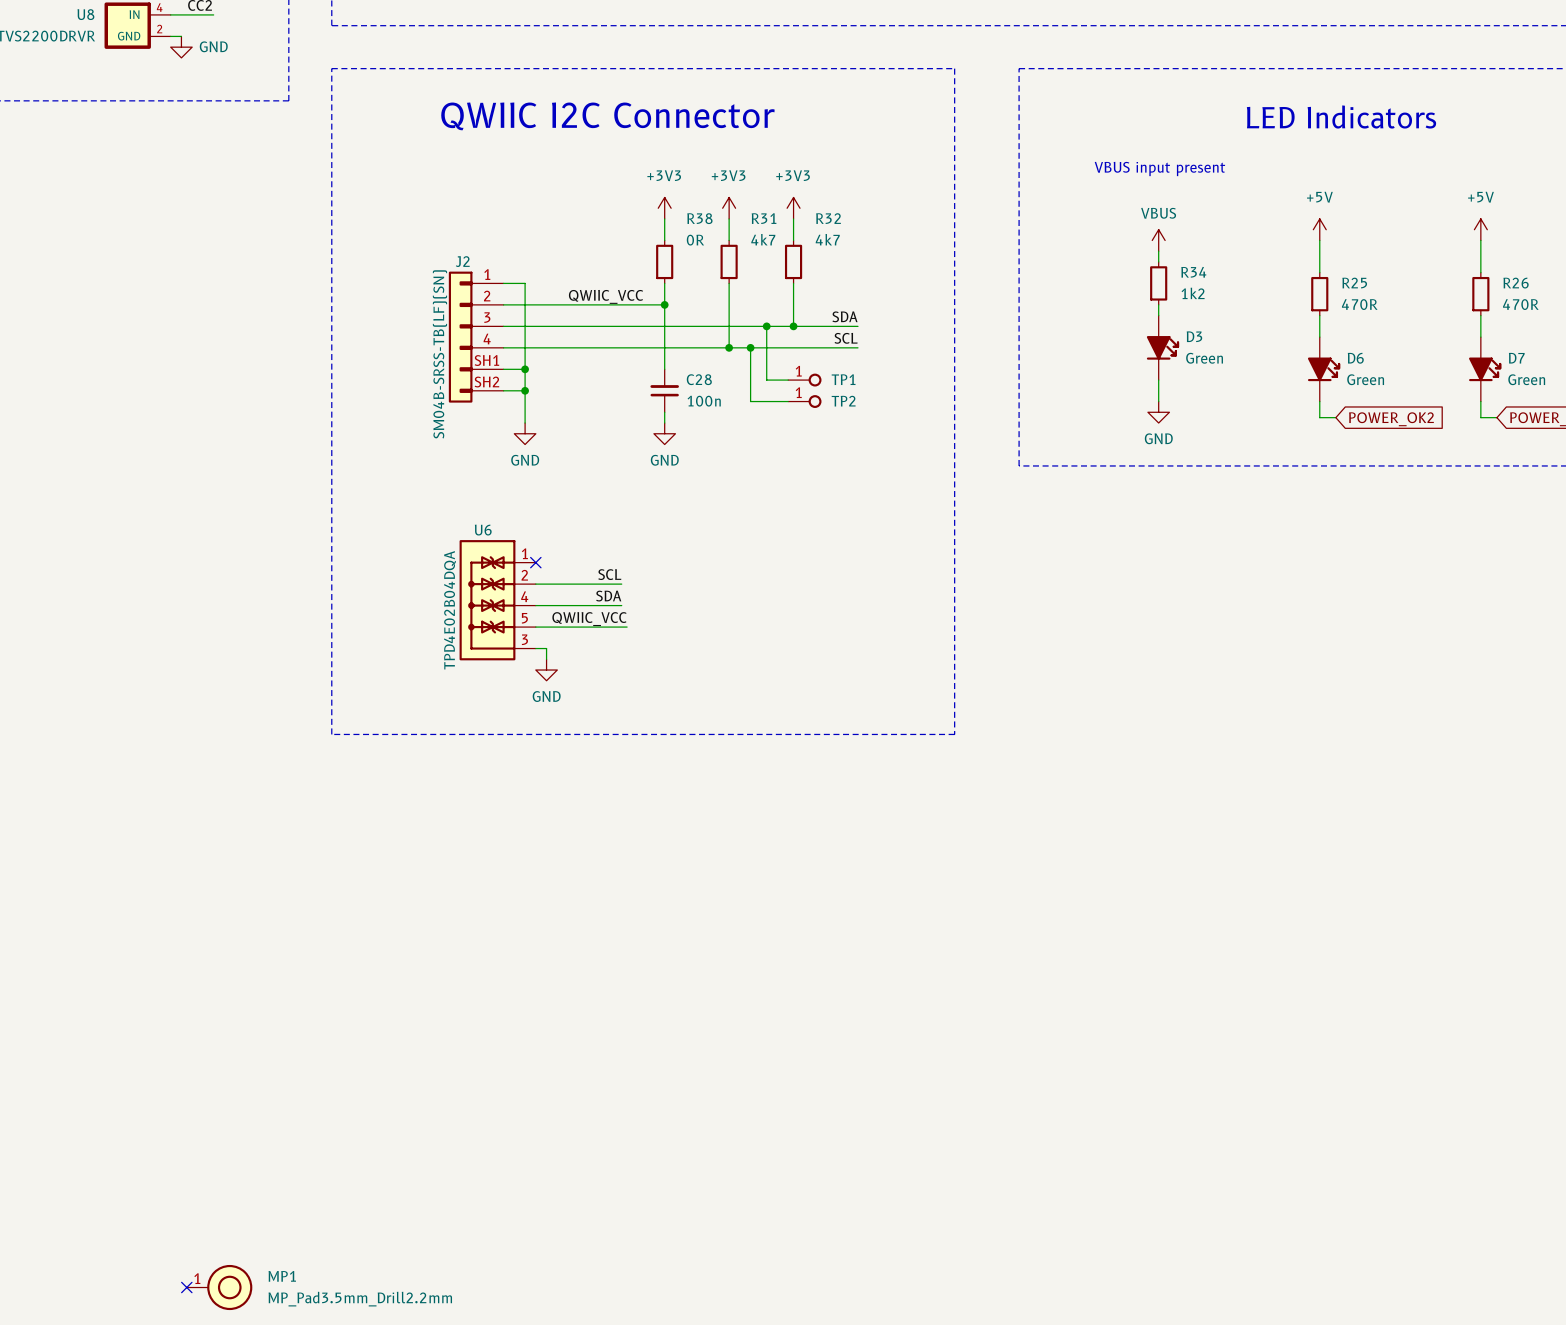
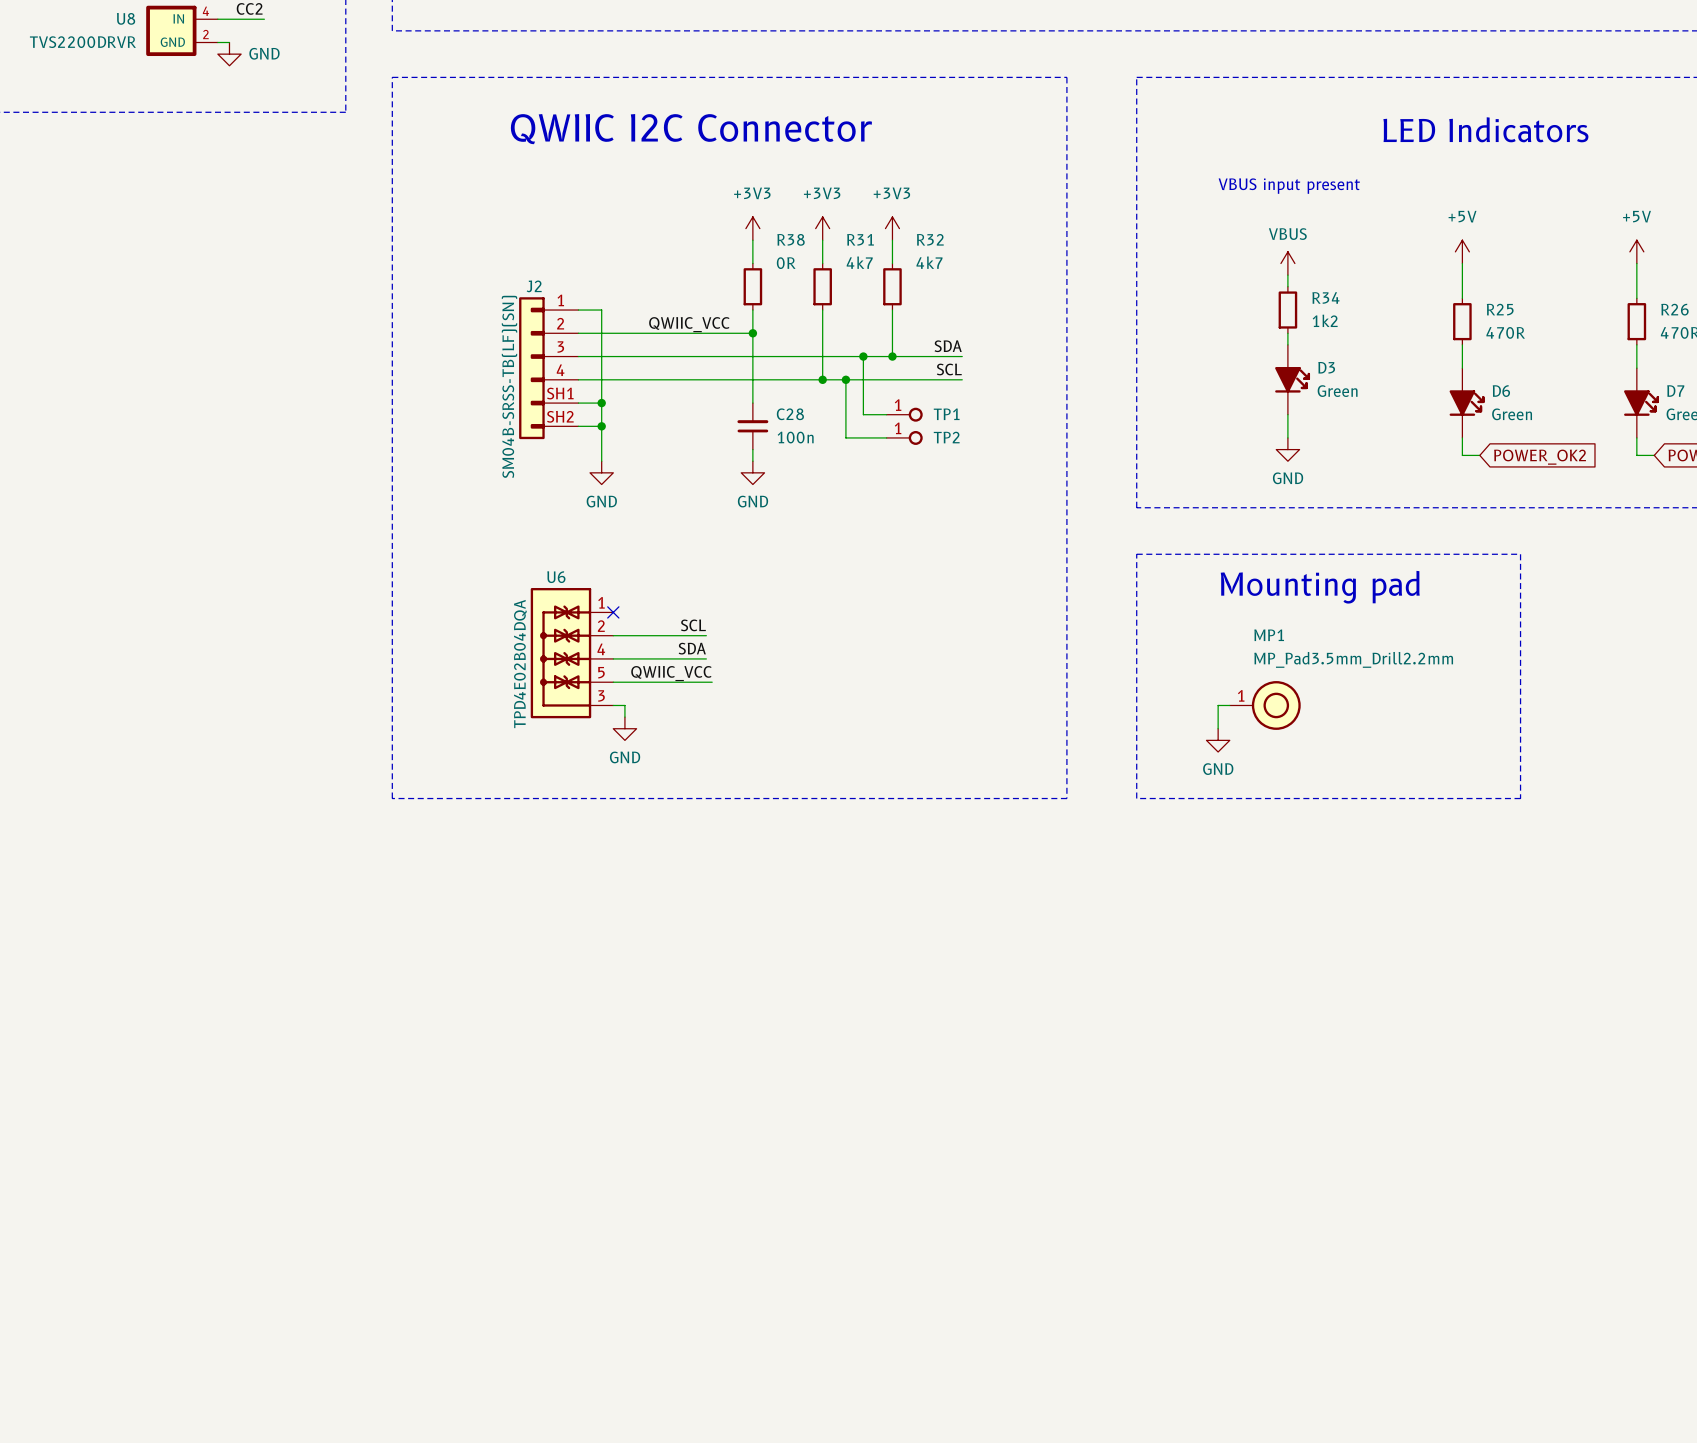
line: none -> (1136, 554) (1520, 554) (1520, 798) (1136, 798) (1136, 554)
text: none -> Mounting pad (1320, 587)
wire: none -> (1229, 705) (1218, 705) (1218, 728)
power symbol: none -> GND (1218, 740)
MP1 name position: MP1 (282, 1276) -> MP1 (1269, 635)
no-connect mark: (186, 1287) -> none
MP1 position: (219, 1287) -> (1265, 705)
MP1 value position: MP_Pad3.5mm_Drill2.2mm (360, 1299) -> MP_Pad3.5mm_Drill2.2mm (1353, 659)

